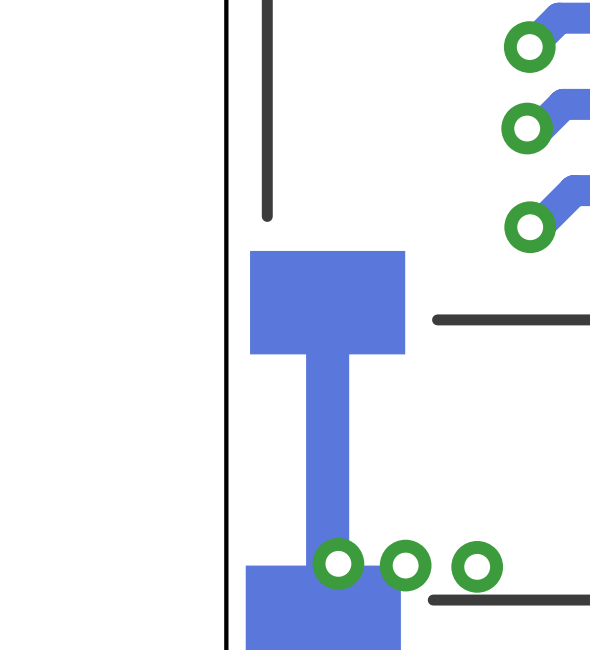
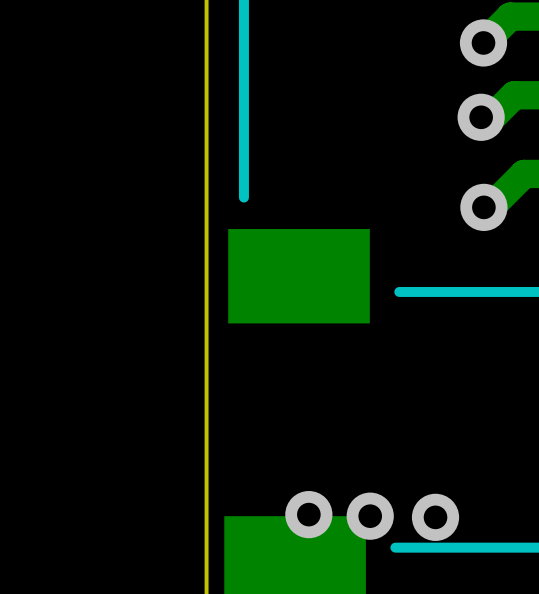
track: (327, 302) (327, 603) (315, 616) -> none

